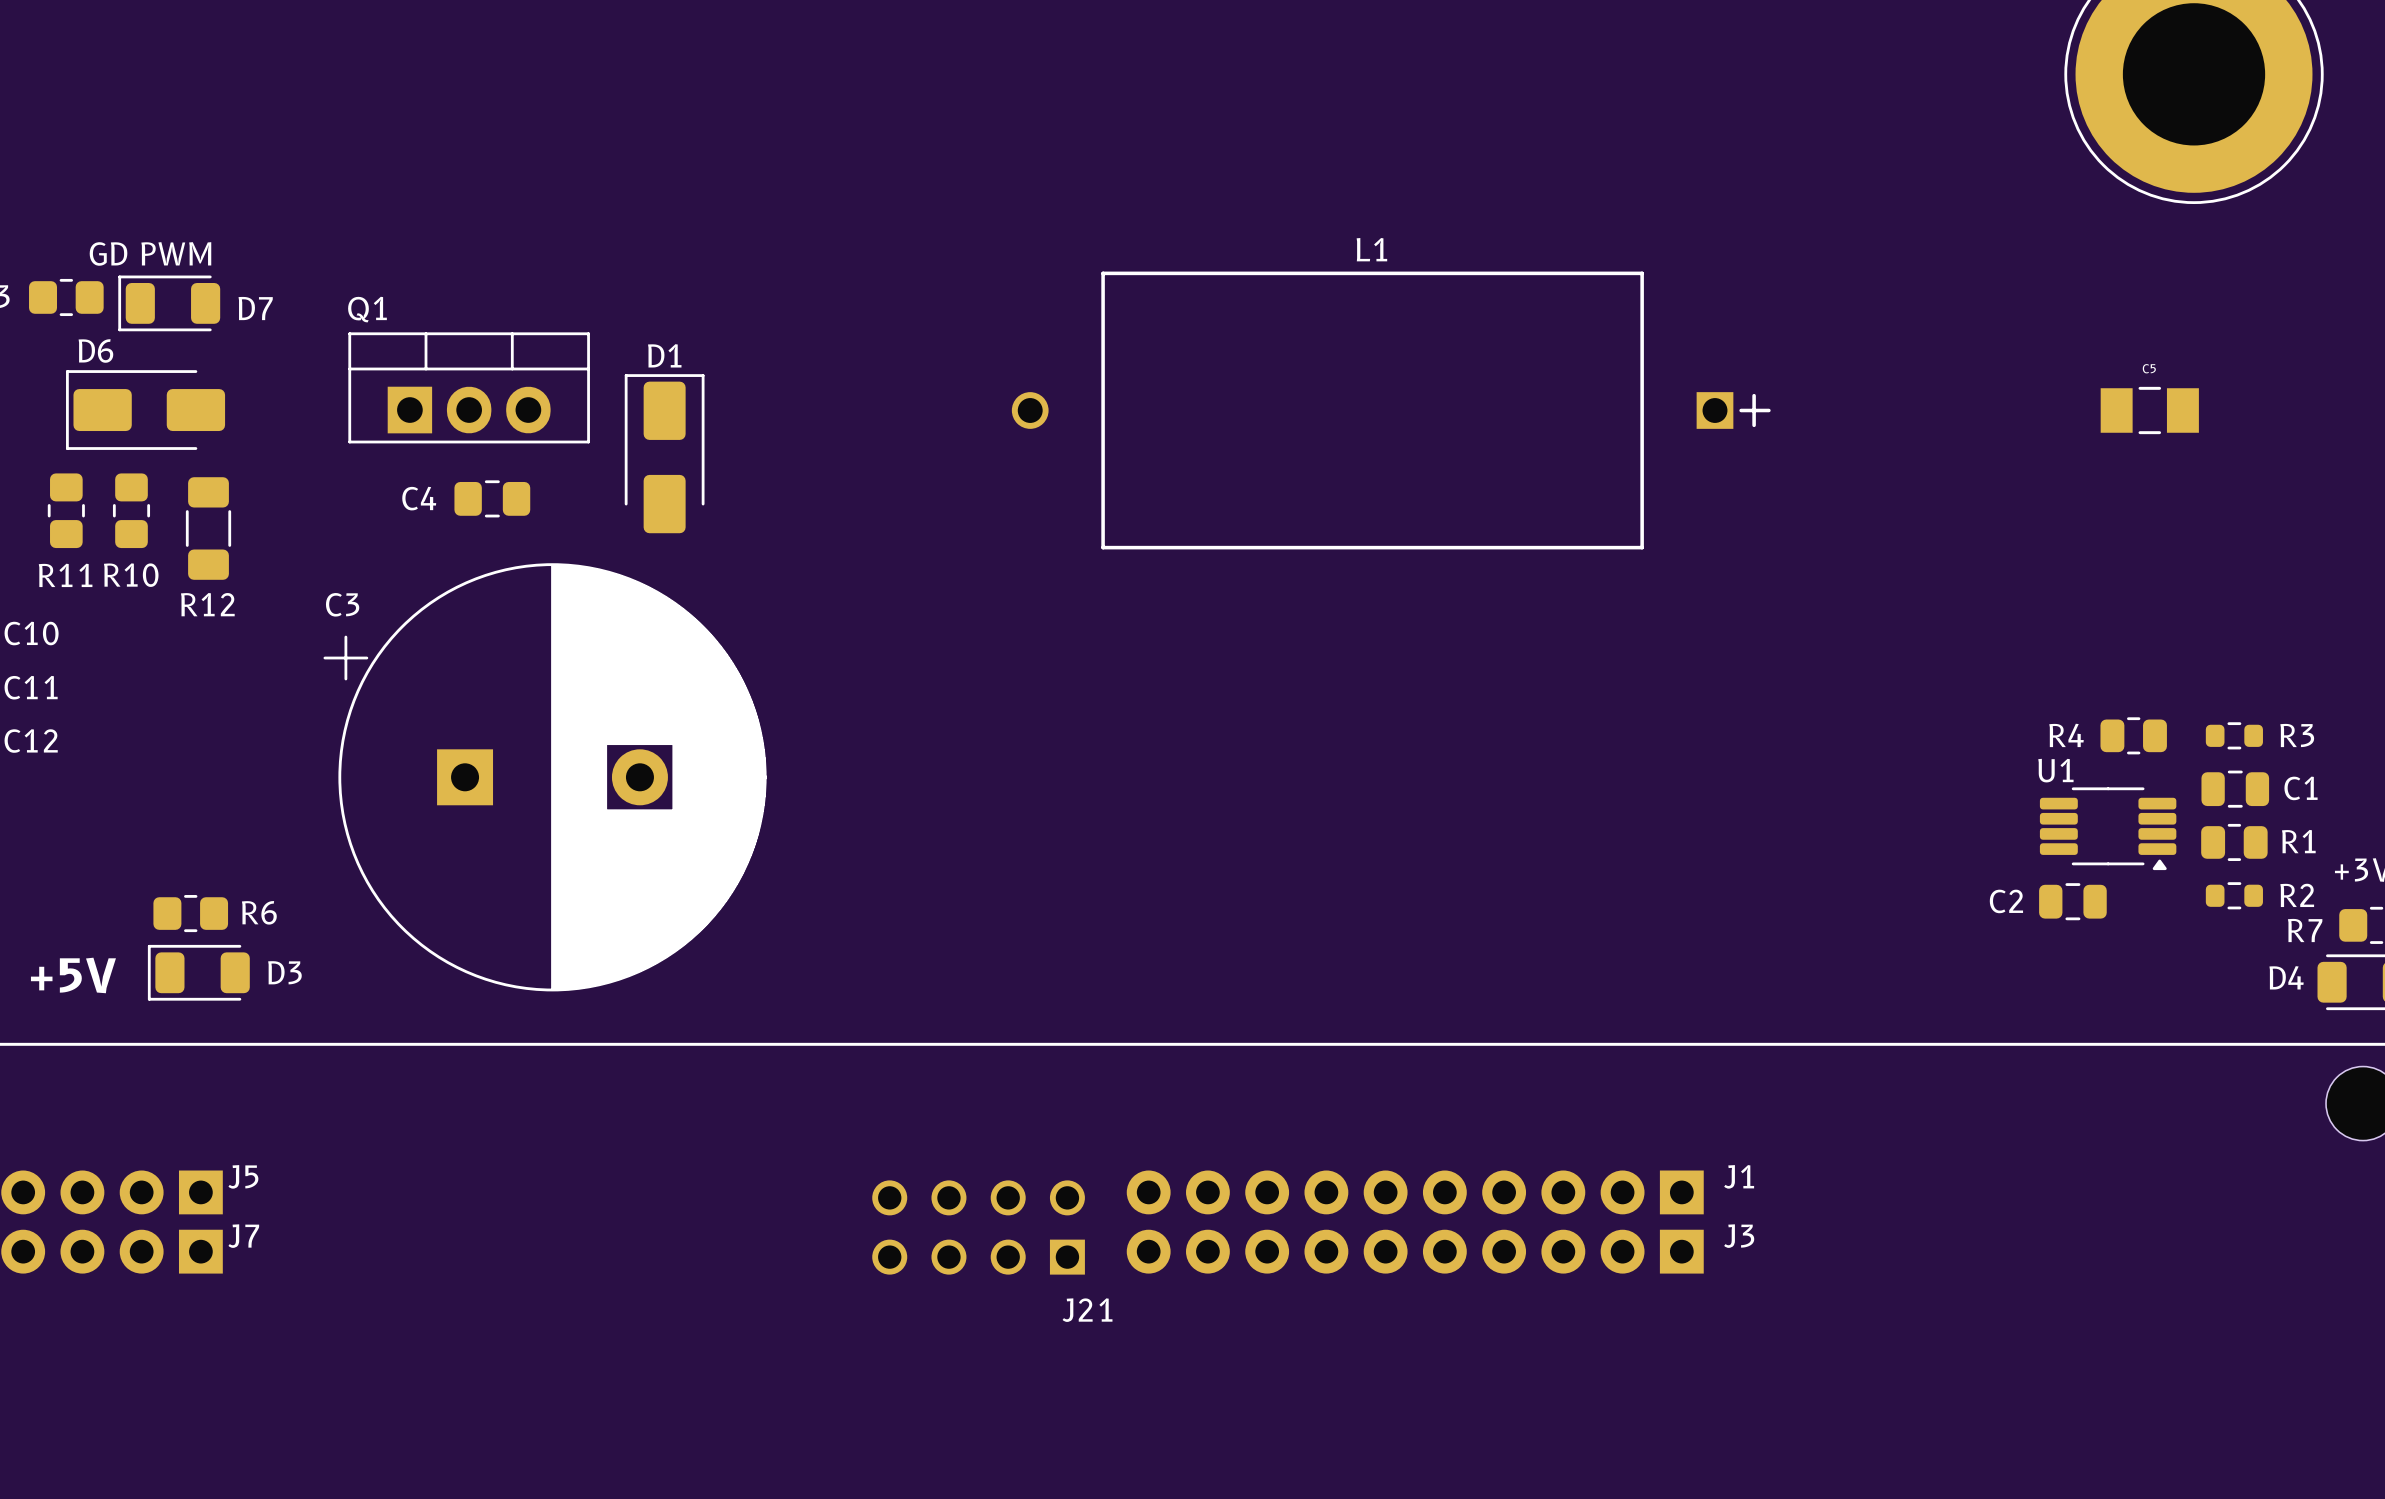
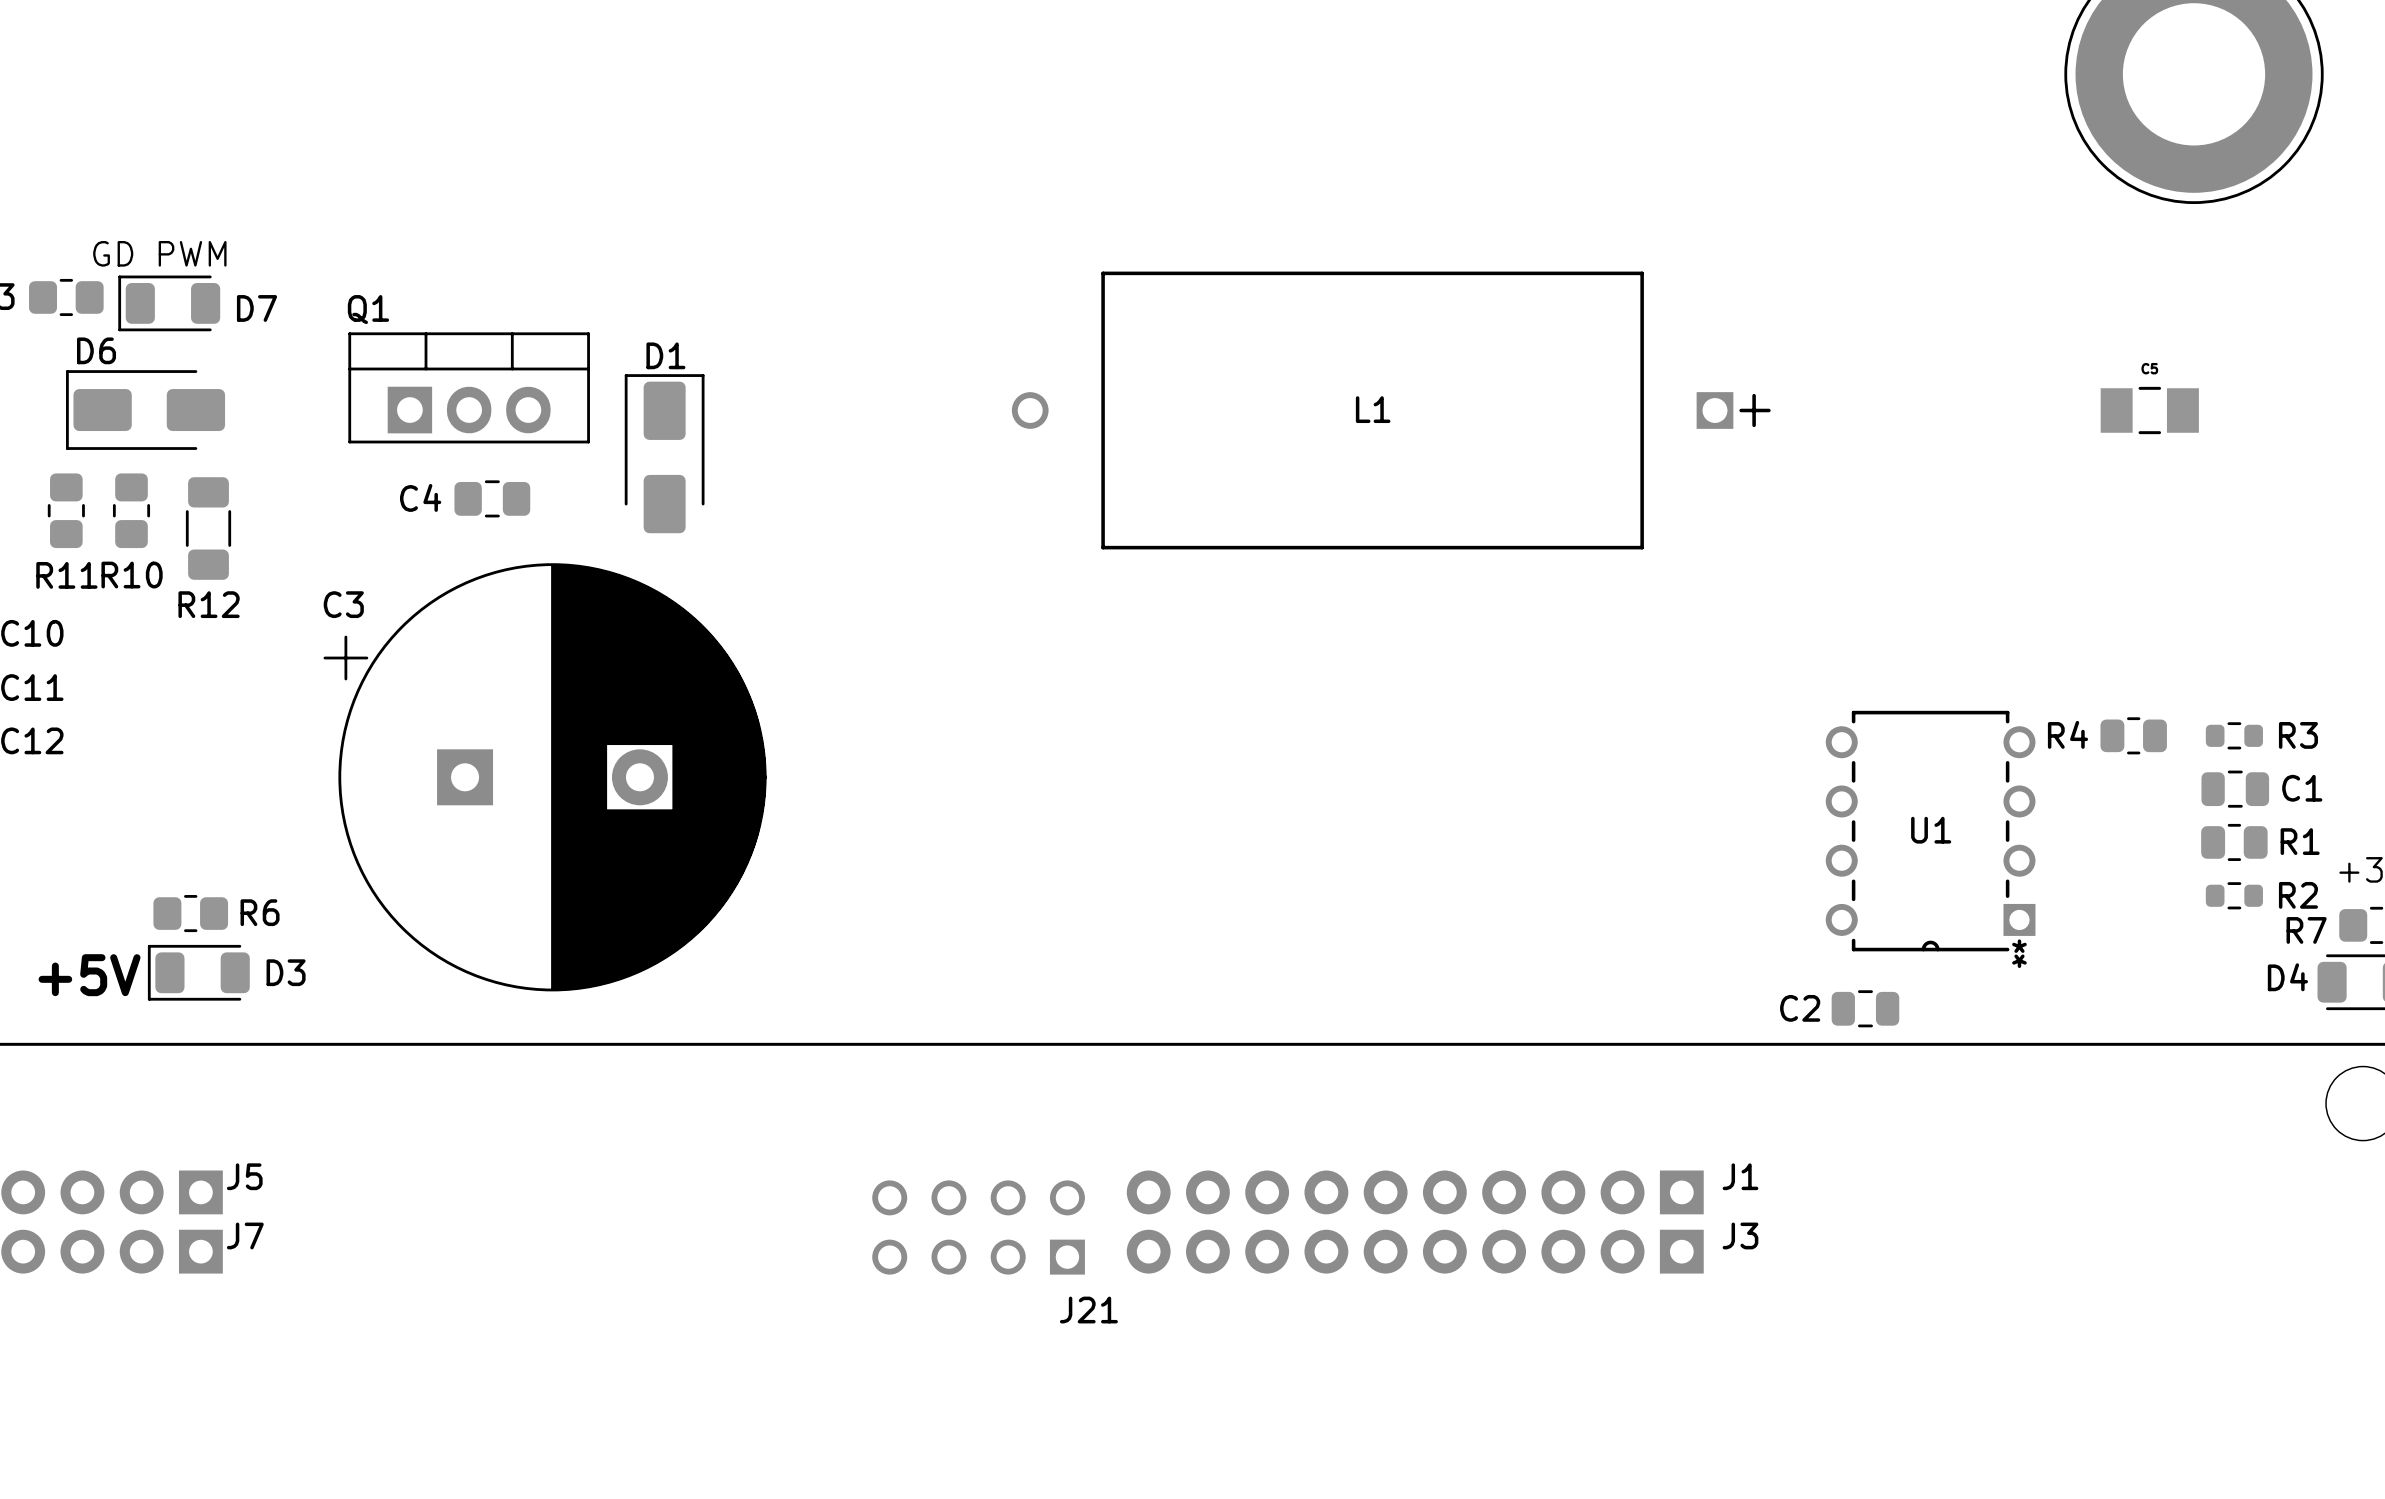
L1 name position: L1 (1371, 249) -> L1 (1373, 409)
U1 name position: U1 (2055, 770) -> U1 (1931, 830)
U1 footprint: [2039, 787, 2177, 871] -> [1825, 710, 2036, 952]
C2 position: (2072, 901) -> (1865, 1008)

